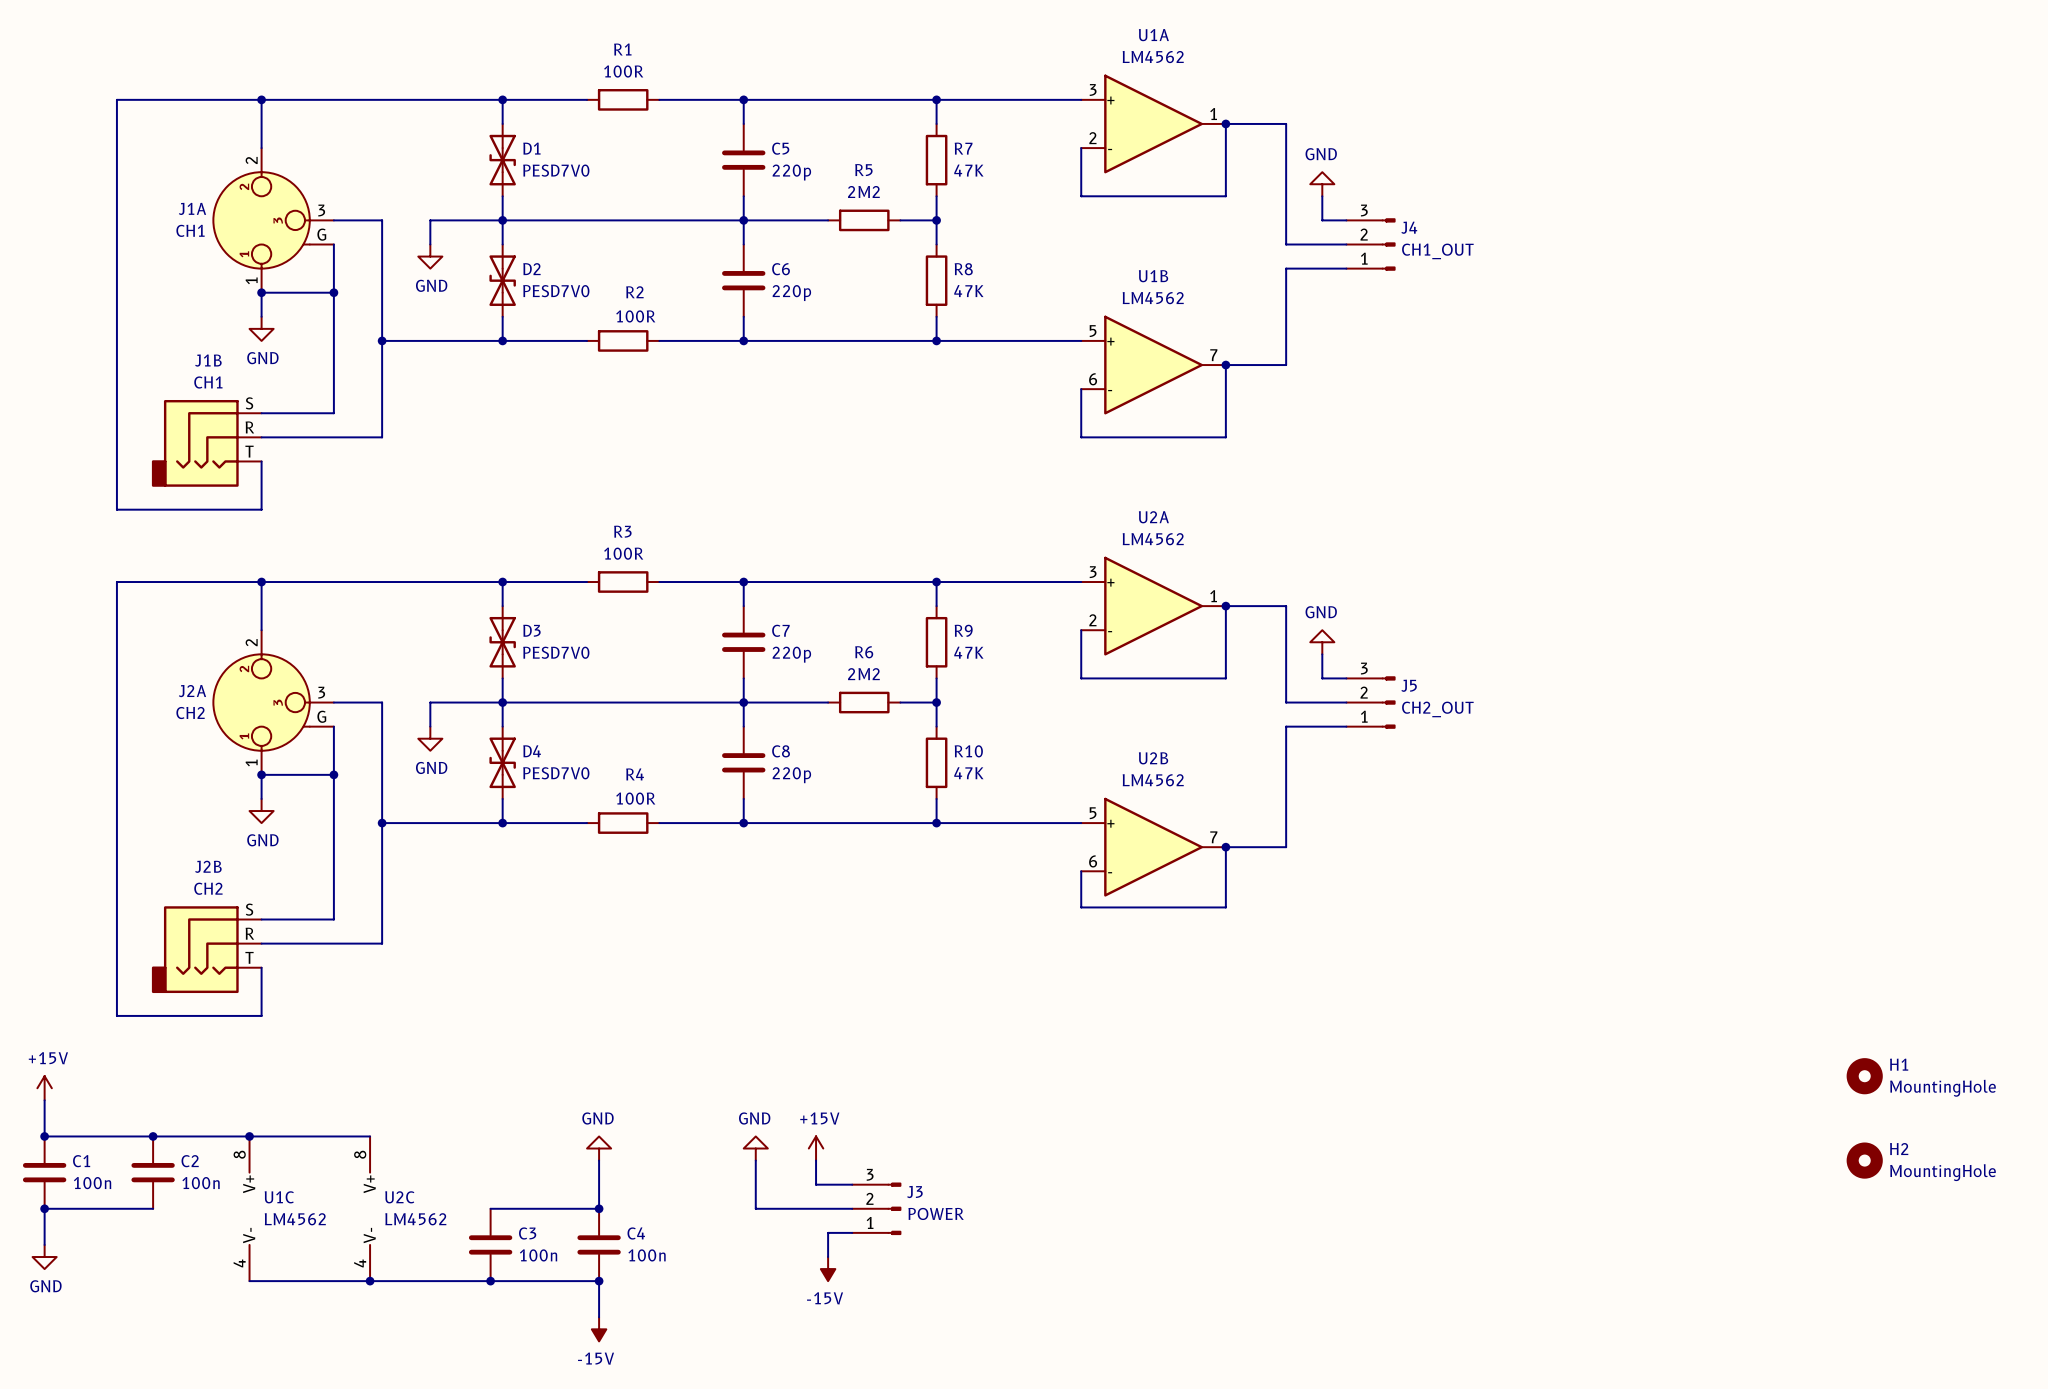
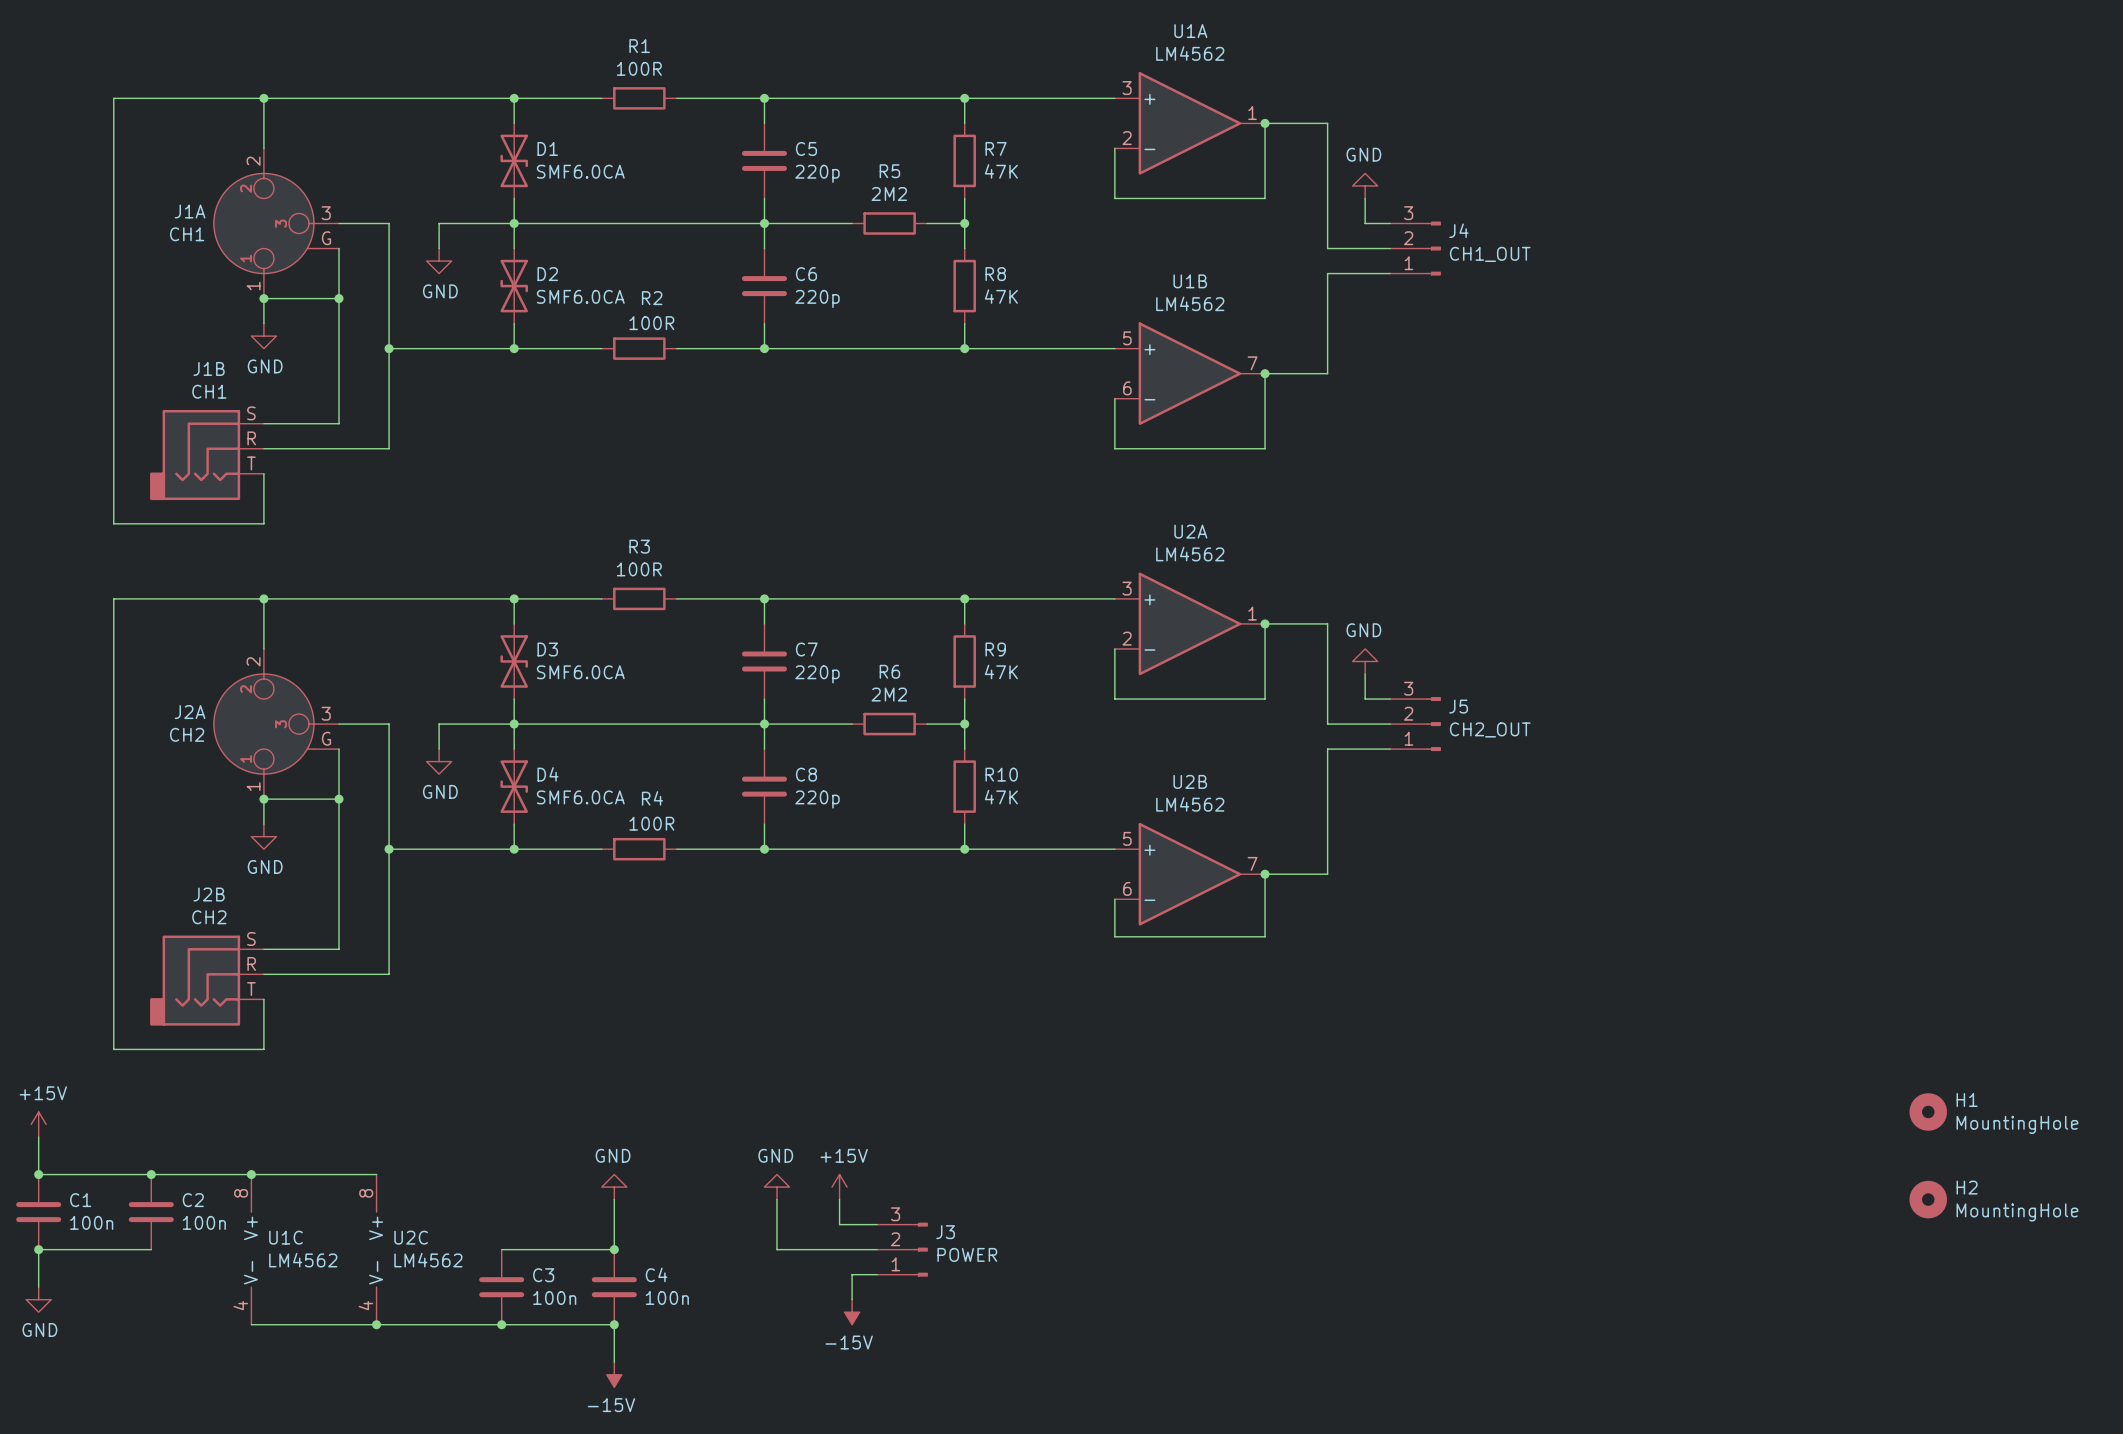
D1 value: PESD7V0 (556, 170) -> SMF6.0CA (580, 171)
D2 value: PESD7V0 (556, 291) -> SMF6.0CA (580, 296)
D3 value: PESD7V0 (556, 652) -> SMF6.0CA (580, 672)
D4 value: PESD7V0 (556, 773) -> SMF6.0CA (580, 797)

